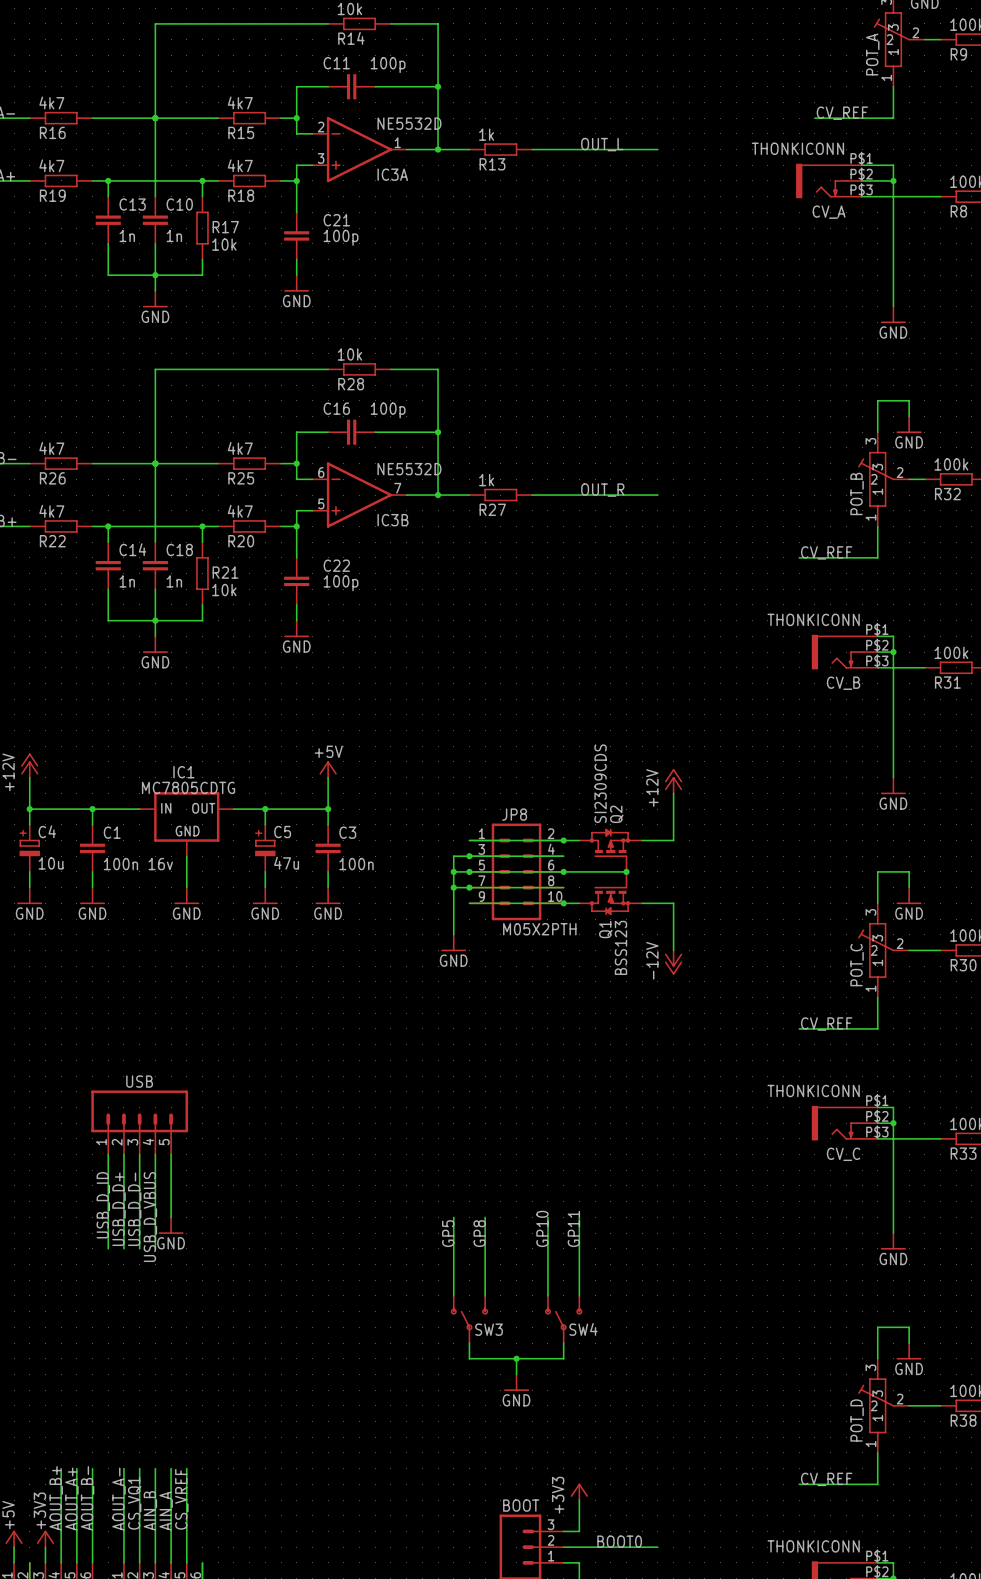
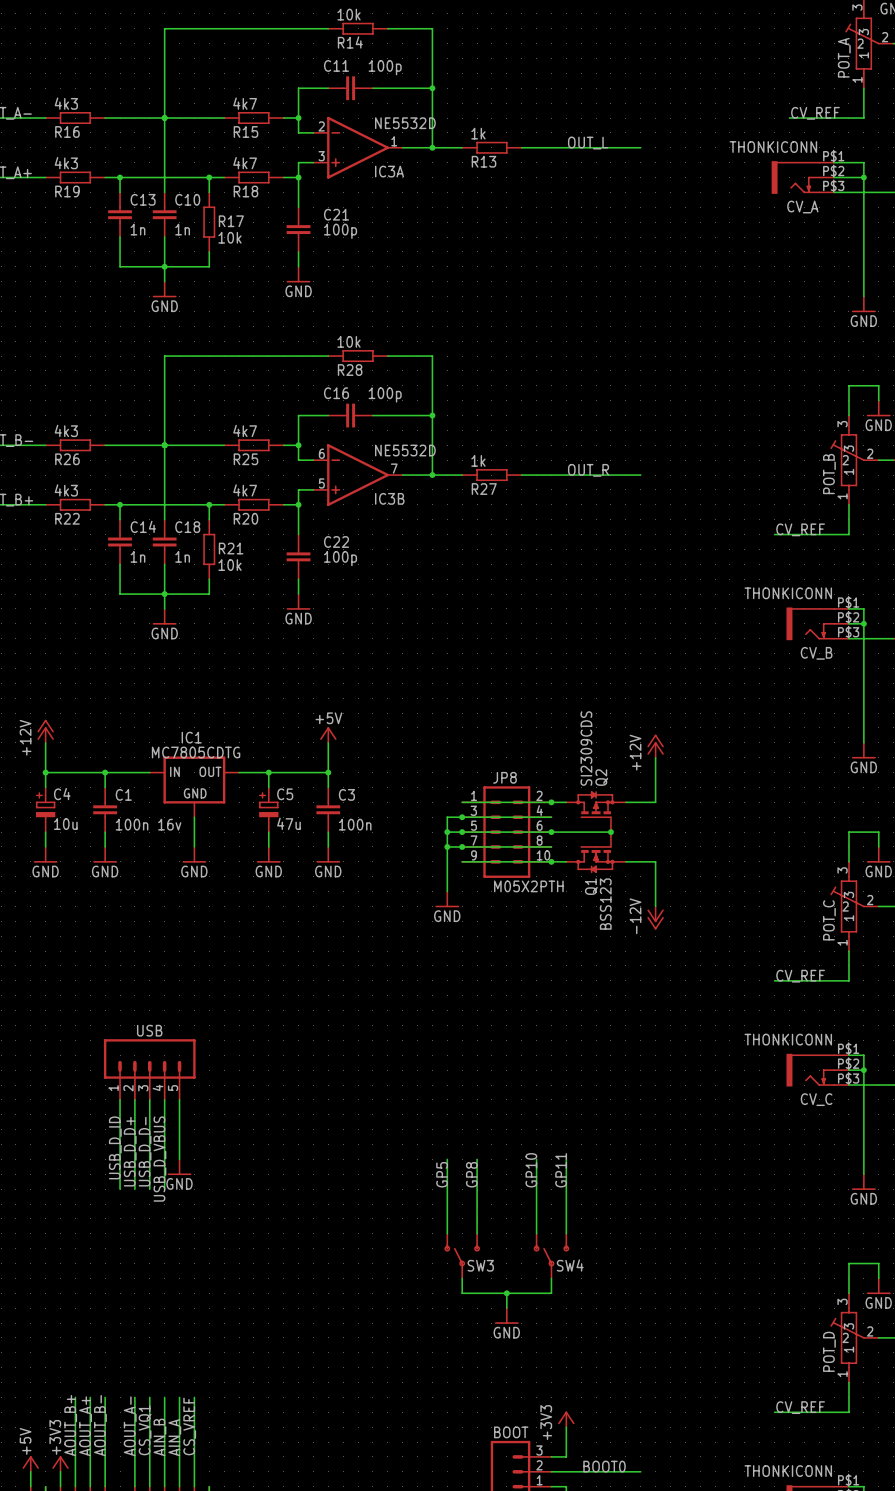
R16 value: 4k7 (51, 102) -> 4k3 (66, 103)
R19 value: 4k7 (51, 165) -> 4k3 (66, 163)
R26 value: 4k7 (51, 448) -> 4k3 (66, 430)
R22 value: 4k7 (51, 511) -> 4k3 (66, 490)

